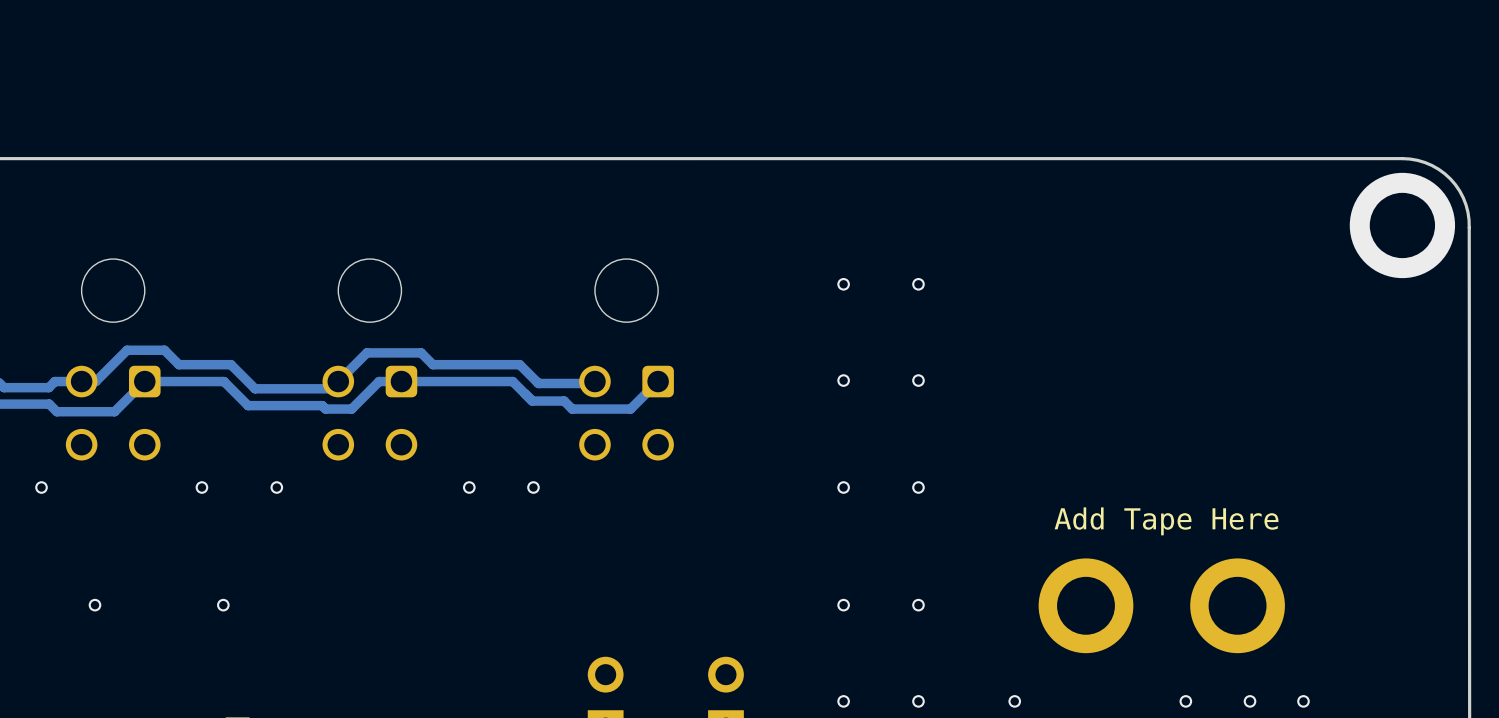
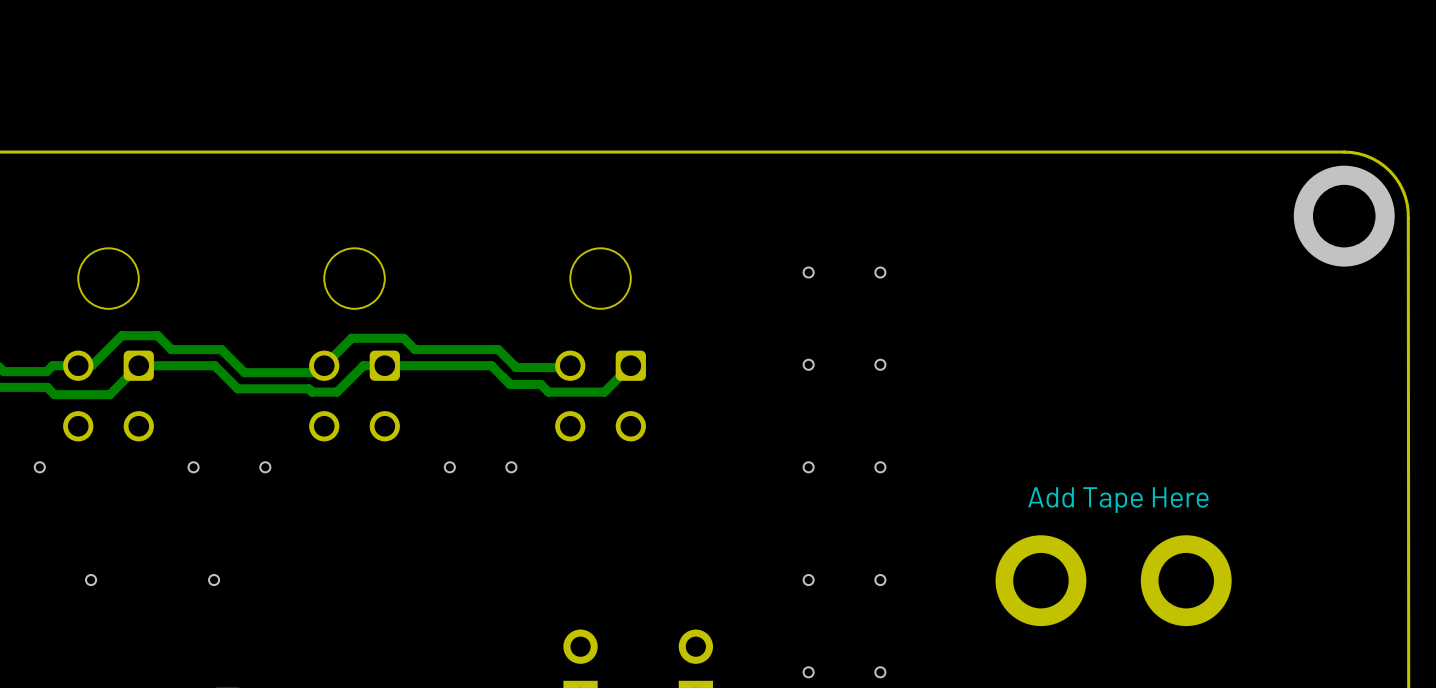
via: (1014, 701) -> none
via: (1185, 701) -> none
via: (1250, 701) -> none
via: (1303, 701) -> none

